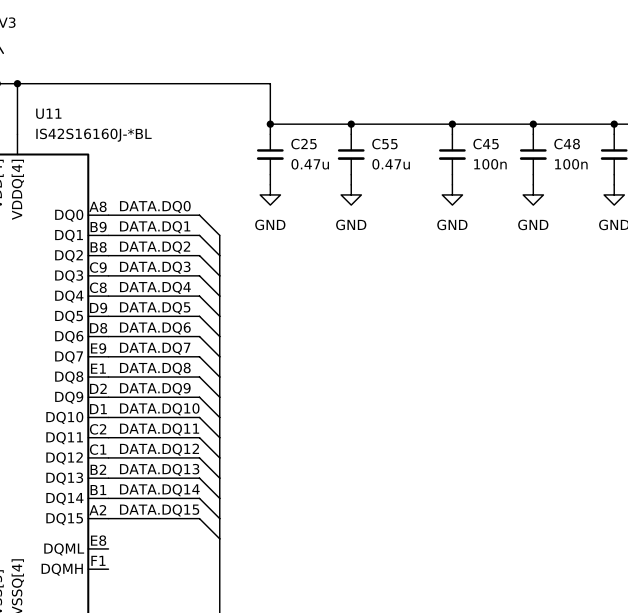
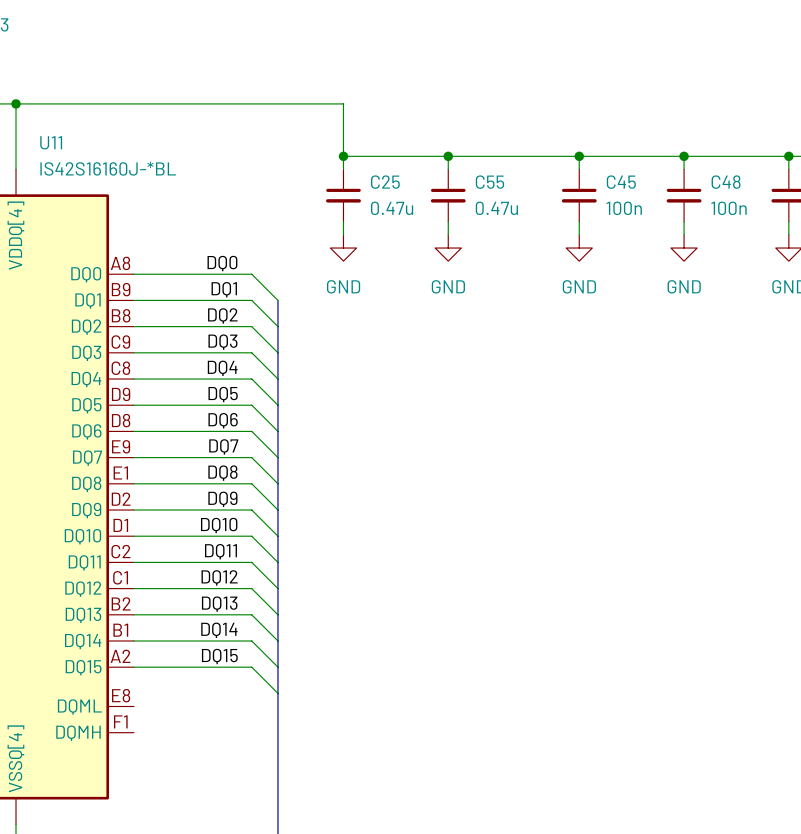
label: DATA.DQ0 (155, 206) -> none
label: none -> DQ0 (222, 263)
label: DATA.DQ1 (155, 227) -> none
label: none -> DQ1 (224, 289)
label: DATA.DQ2 (155, 247) -> none
label: none -> DQ2 (222, 315)
label: DATA.DQ3 (155, 267) -> none
label: none -> DQ3 (222, 342)
label: DATA.DQ4 (155, 287) -> none
label: none -> DQ4 (222, 368)
label: DATA.DQ5 (155, 308) -> none
label: none -> DQ5 (223, 394)
label: DATA.DQ6 (155, 328) -> none
label: none -> DQ6 (223, 420)
label: DATA.DQ7 (155, 348) -> none
label: none -> DQ7 (223, 446)
label: DATA.DQ8 (155, 368) -> none
label: none -> DQ8 (222, 473)
label: DATA.DQ9 (155, 389) -> none
label: none -> DQ9 (222, 499)
label: DATA.DQ10 (159, 409) -> DQ10 (219, 525)
label: DATA.DQ11 (159, 429) -> DQ11 (220, 551)
label: DATA.DQ12 (159, 449) -> DQ12 (219, 577)
label: DATA.DQ13 (159, 469) -> DQ13 (219, 604)
label: DATA.DQ14 (159, 490) -> DQ14 (219, 630)
label: DATA.DQ15 (159, 510) -> DQ15 (219, 656)

